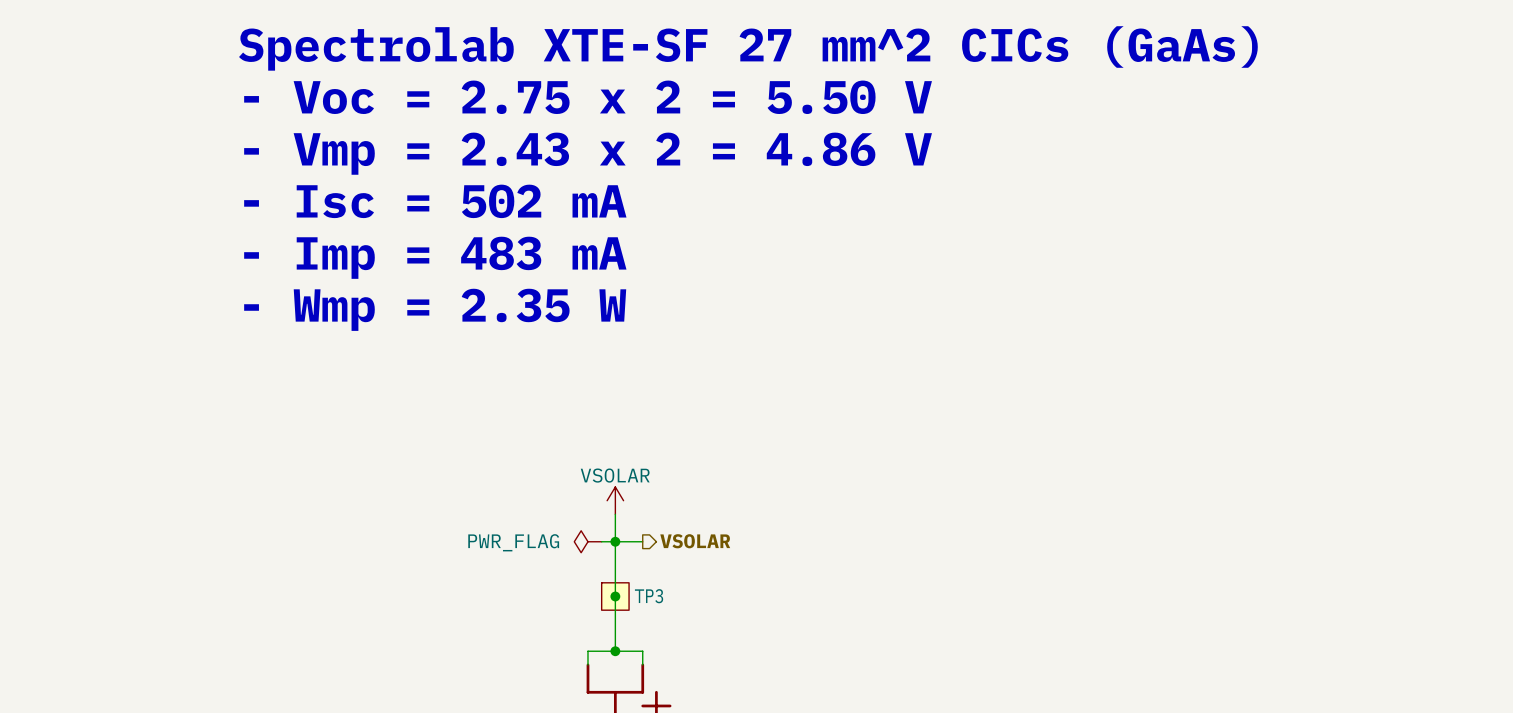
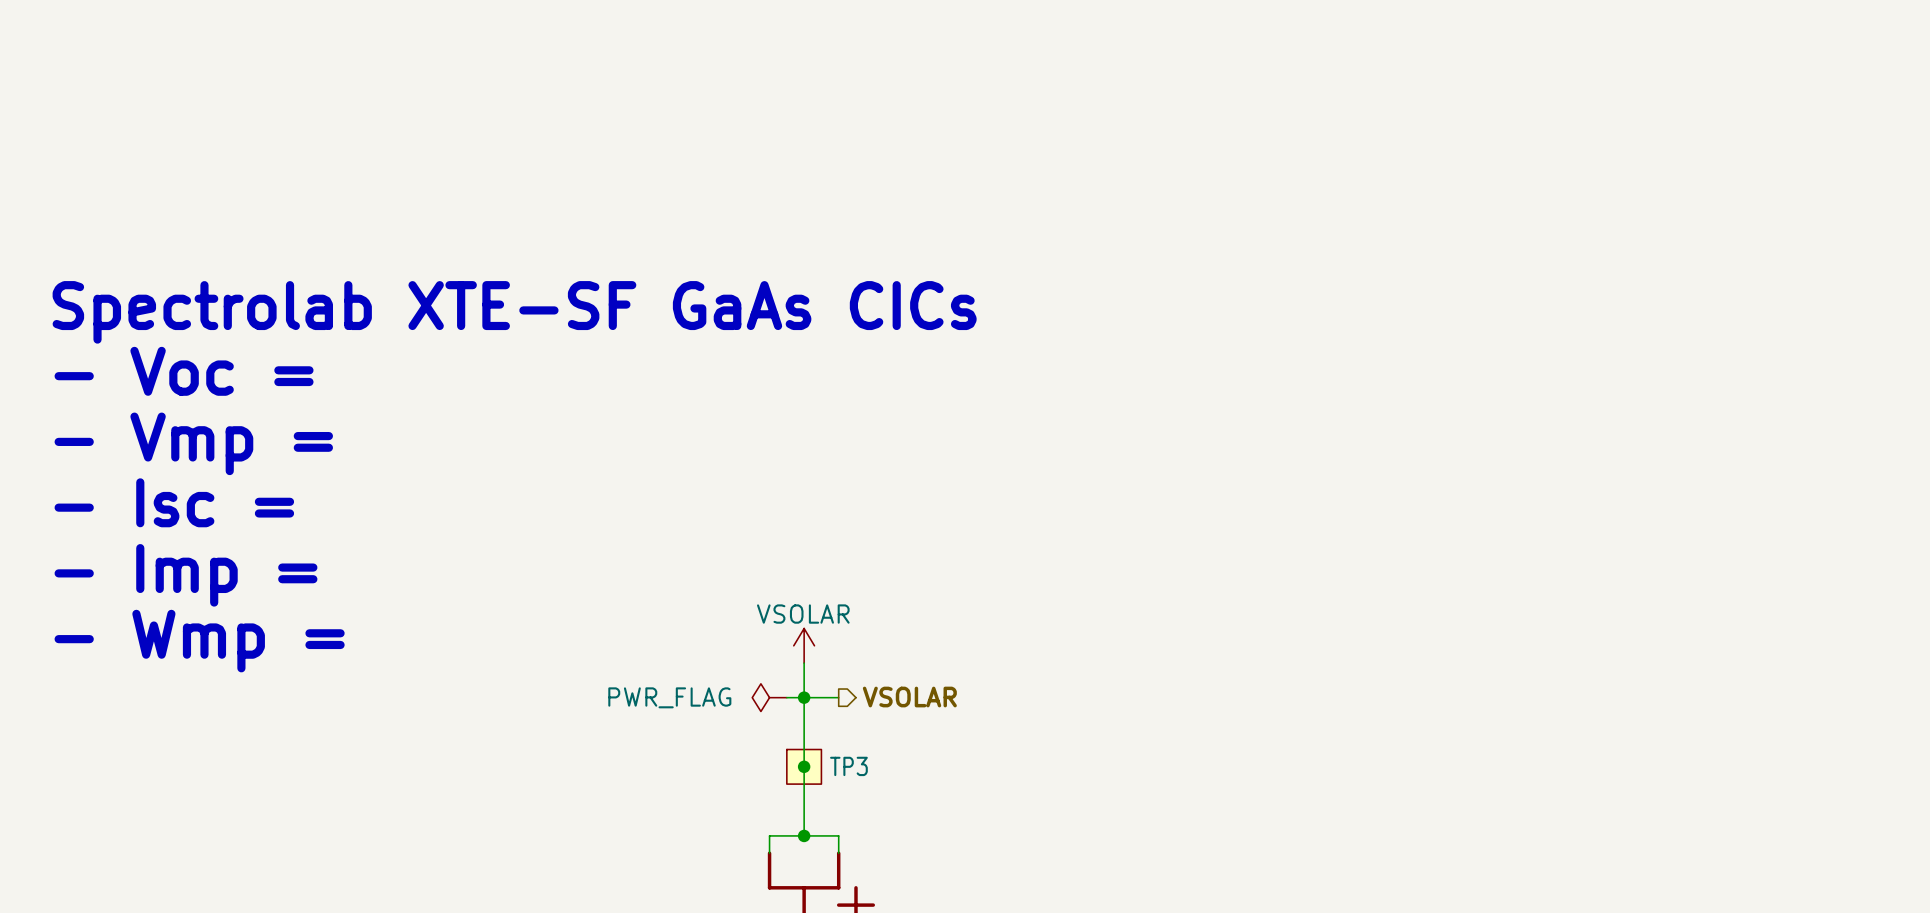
text: Spectrolab XTE-SF 27 mm^2 CICs (GaAs) (748, 48) -> none
text: - Voc = 2.75 x 2 = 5.50 V (588, 97) -> none
text: - Vmp = 2.43 x 2 = 4.86 V (588, 153) -> none
text: - Isc = 502 mA (435, 201) -> none
text: none -> Spectrolab XTE-SF GaAs CICs (514, 312)
text: - Imp = 483 mA (435, 257) -> none
text: none -> - Voc = (184, 371)
text: - Wmp = 2.35 W (435, 309) -> none
text: none -> - Vmp = (193, 443)
text: none -> - Isc = (174, 502)
text: none -> - Imp = (185, 575)
text: none -> - Wmp = (199, 641)

